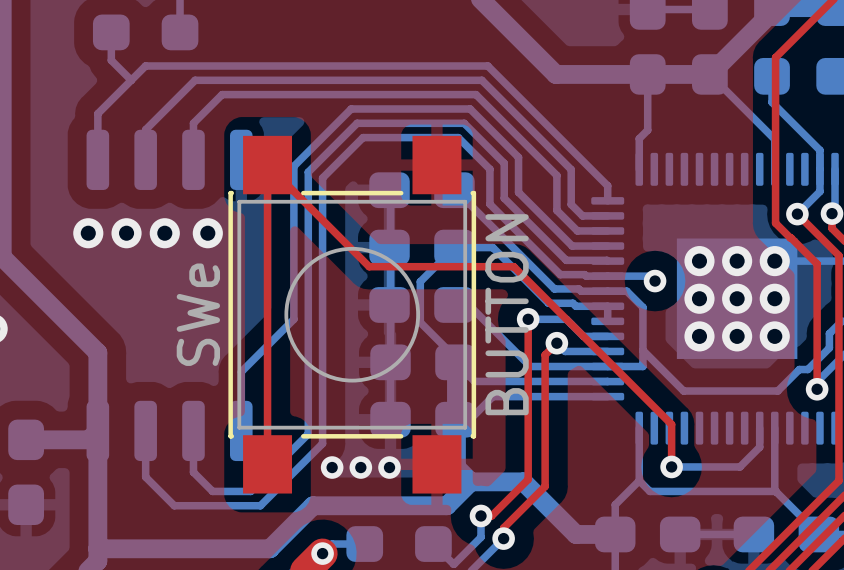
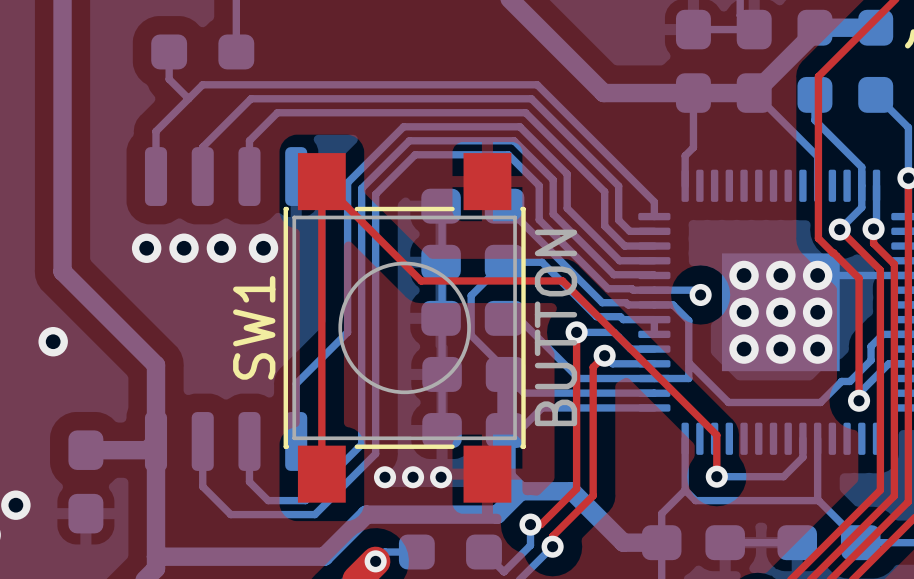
SWe name: SWe (198, 314) -> SW1 (254, 327)

